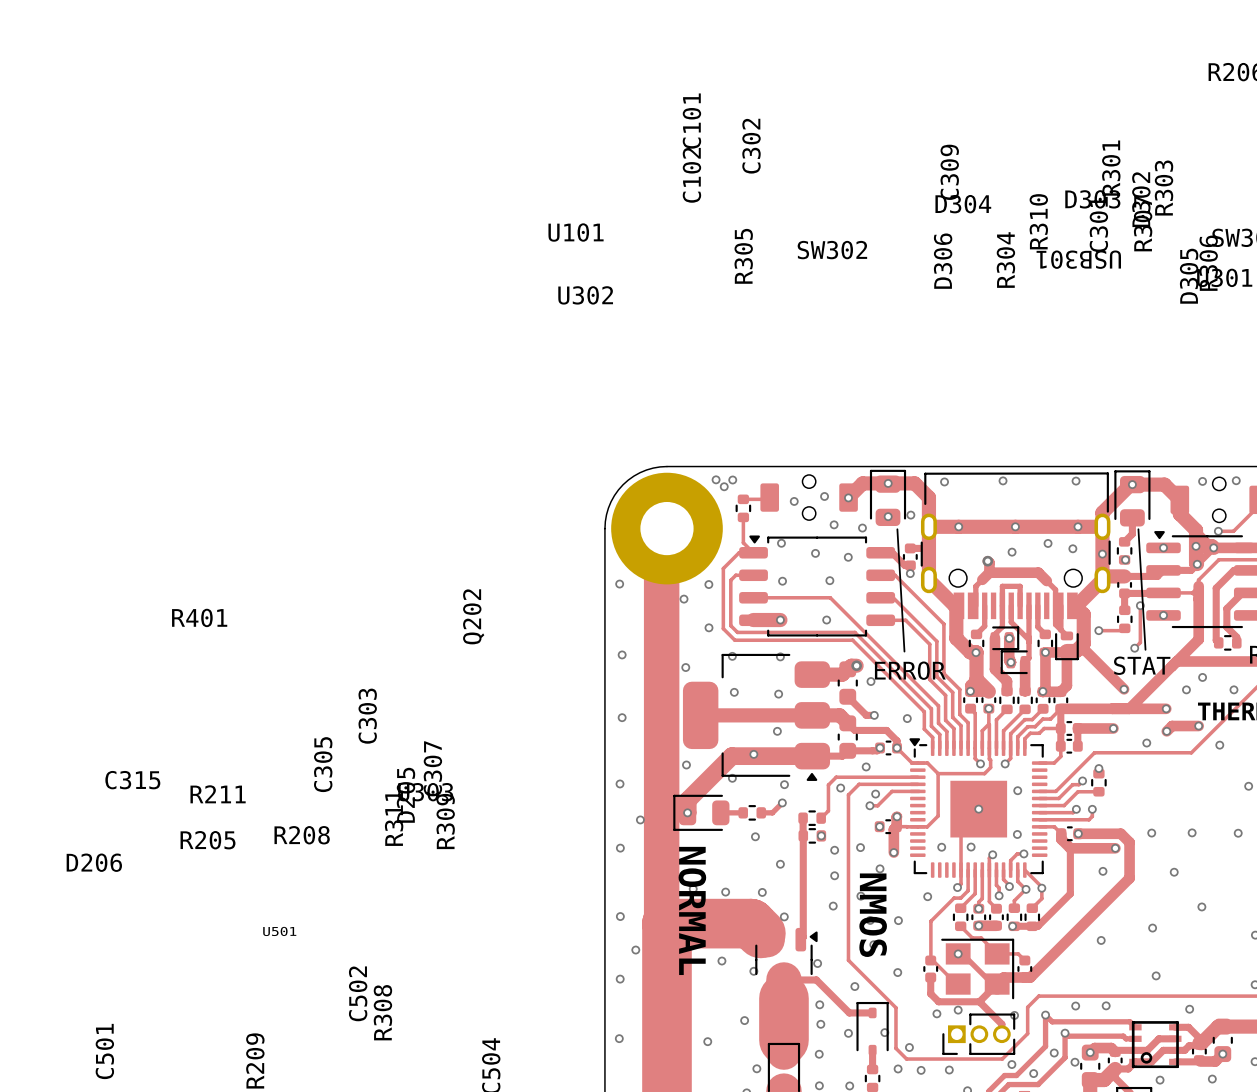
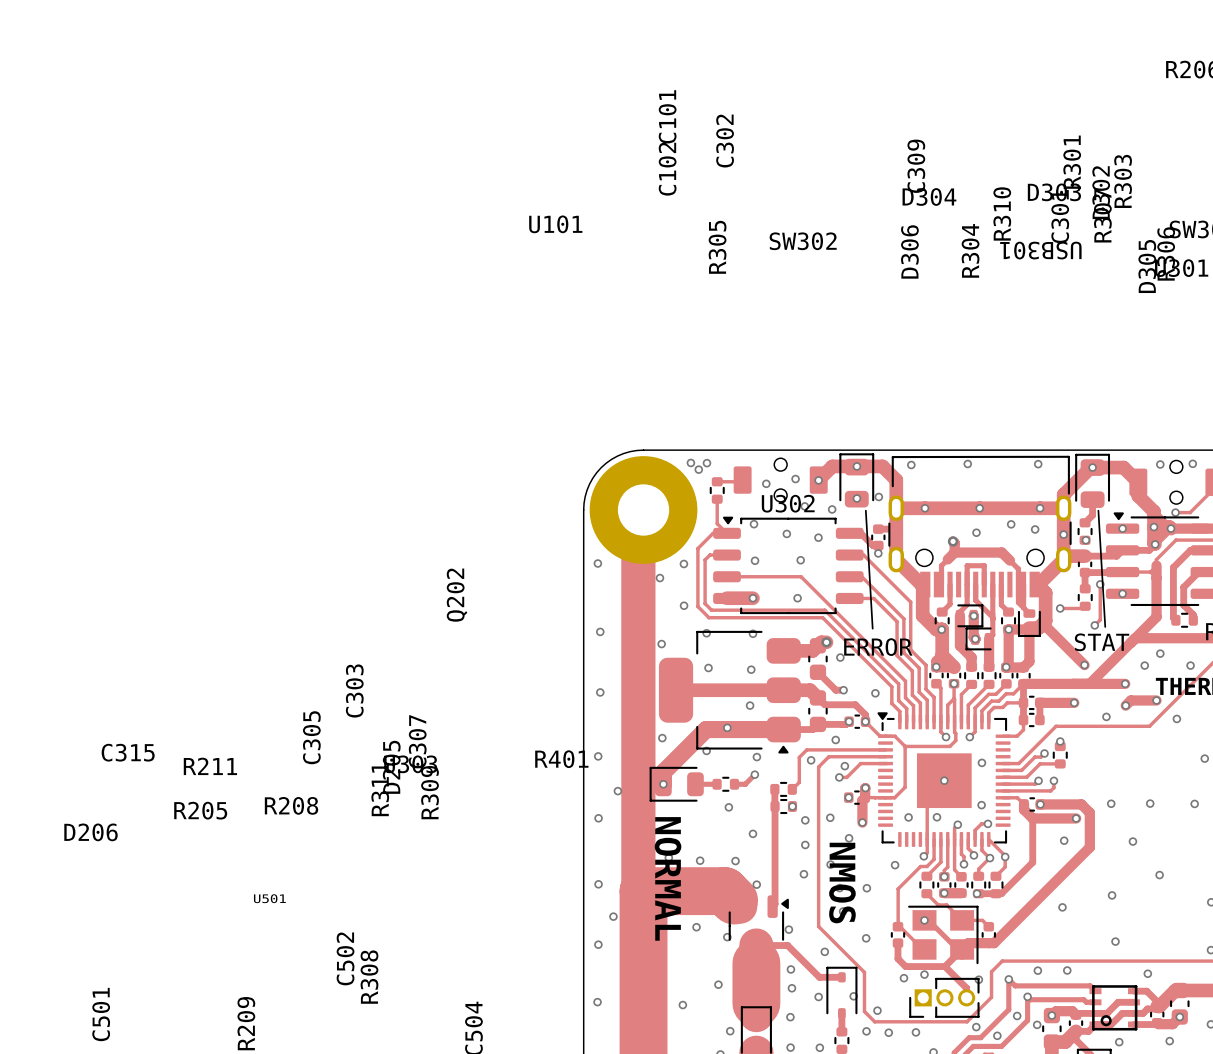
U302 name position: U302 (585, 295) -> U302 (788, 503)
R401 name position: R401 (199, 617) -> R401 (561, 759)

